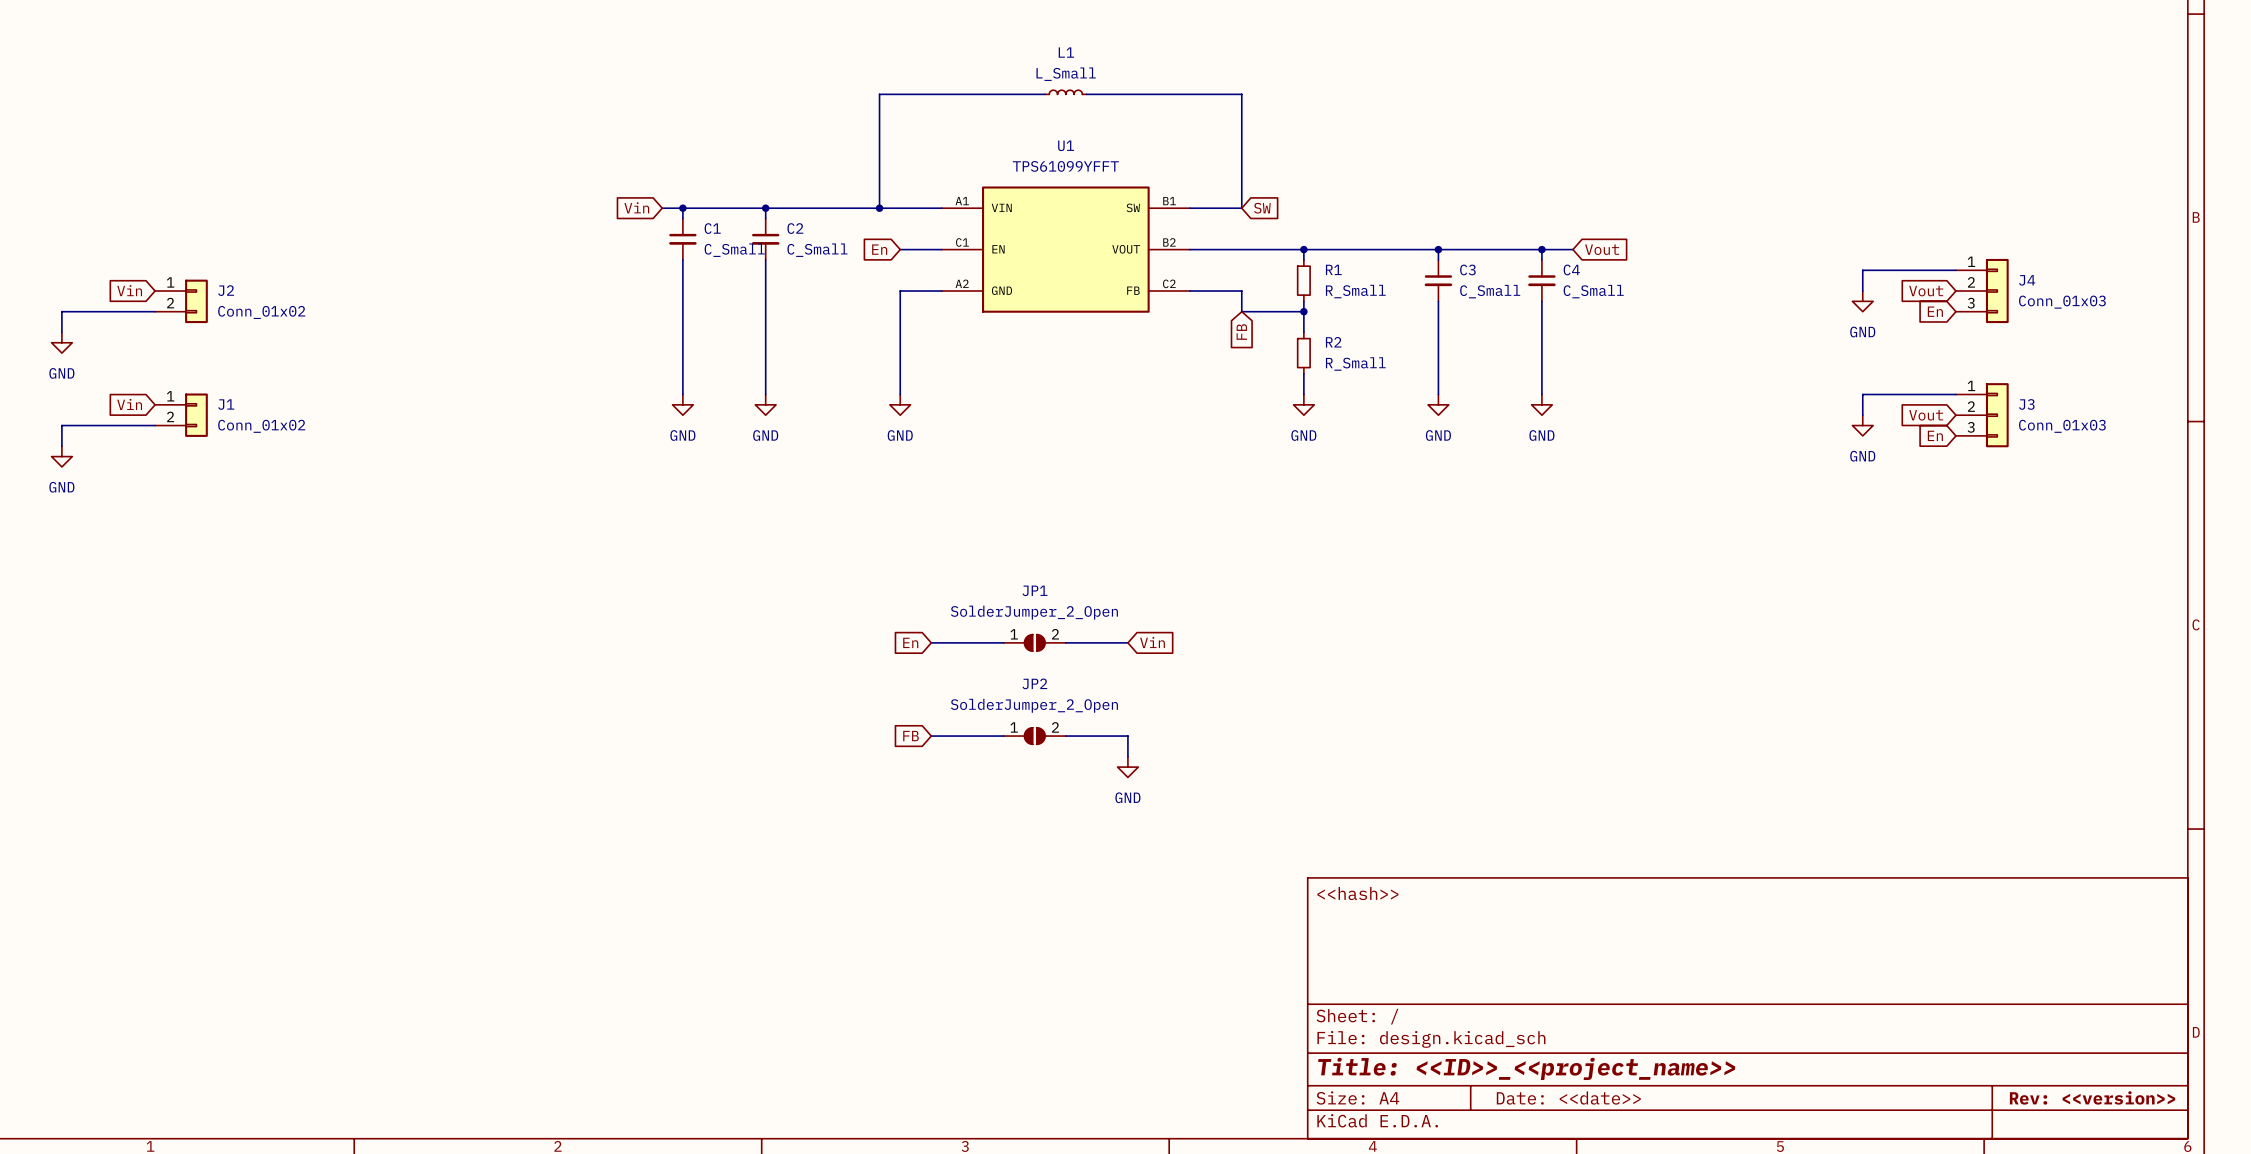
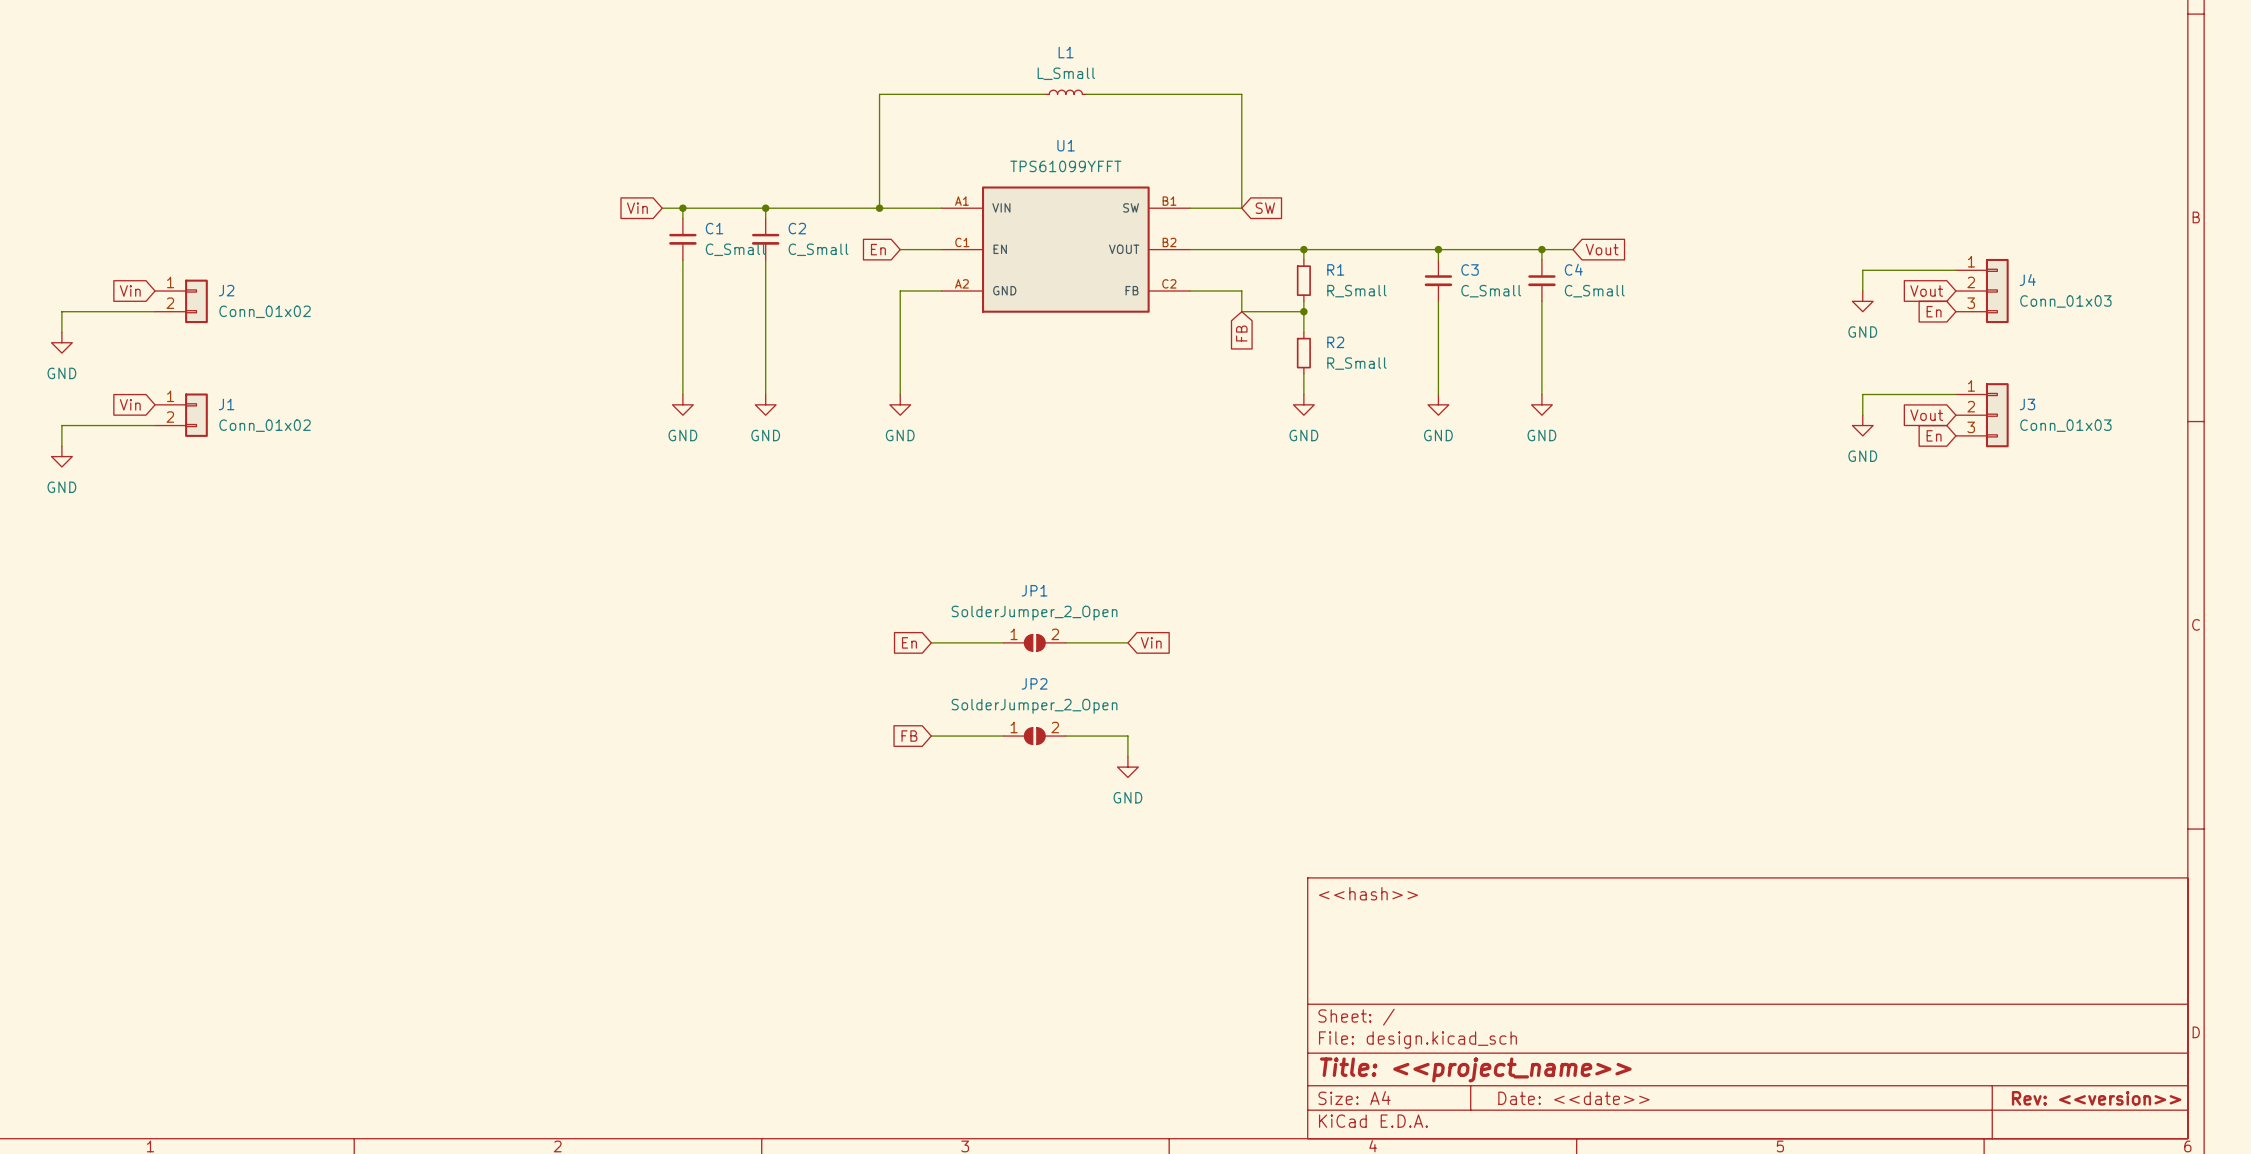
title block: Title: <<ID>>_<<project_name>> (1526, 1068) -> Title: <<project_name>> (1475, 1069)

